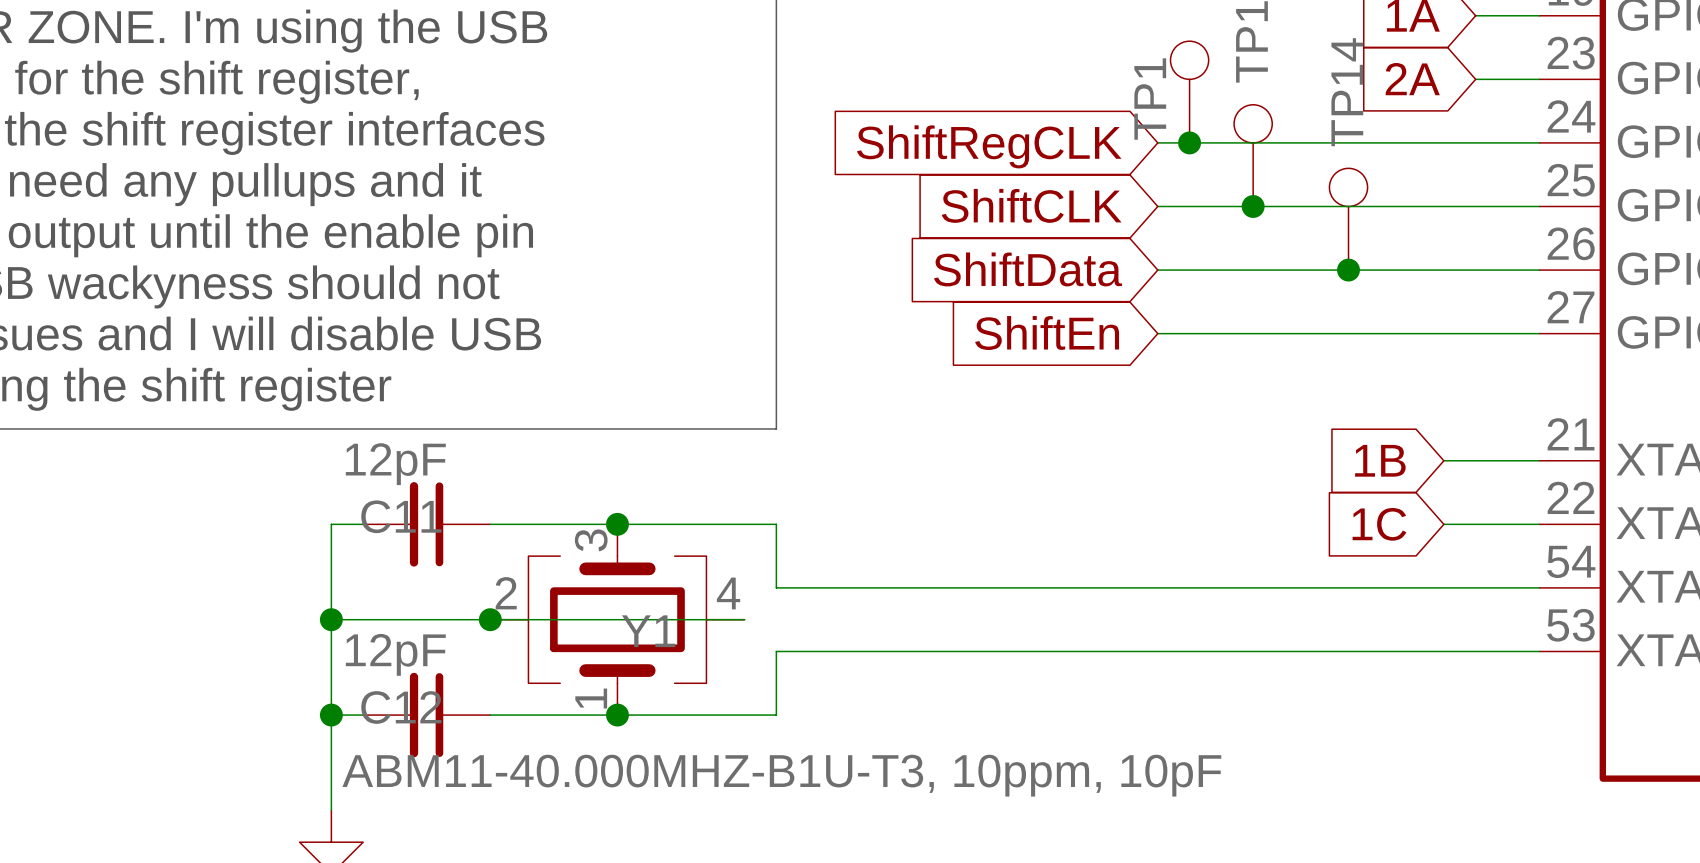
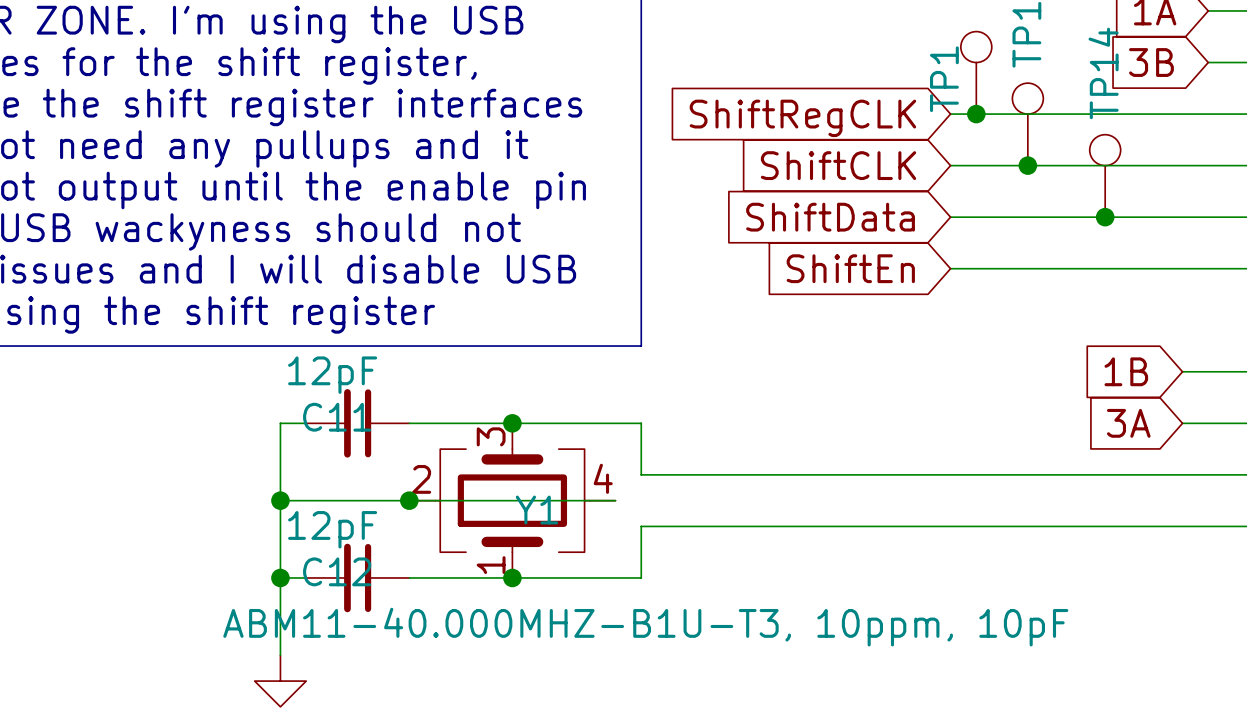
global label: 2A (1412, 79) -> 3B (1151, 62)
global label: 1C (1379, 524) -> 3A (1128, 423)

